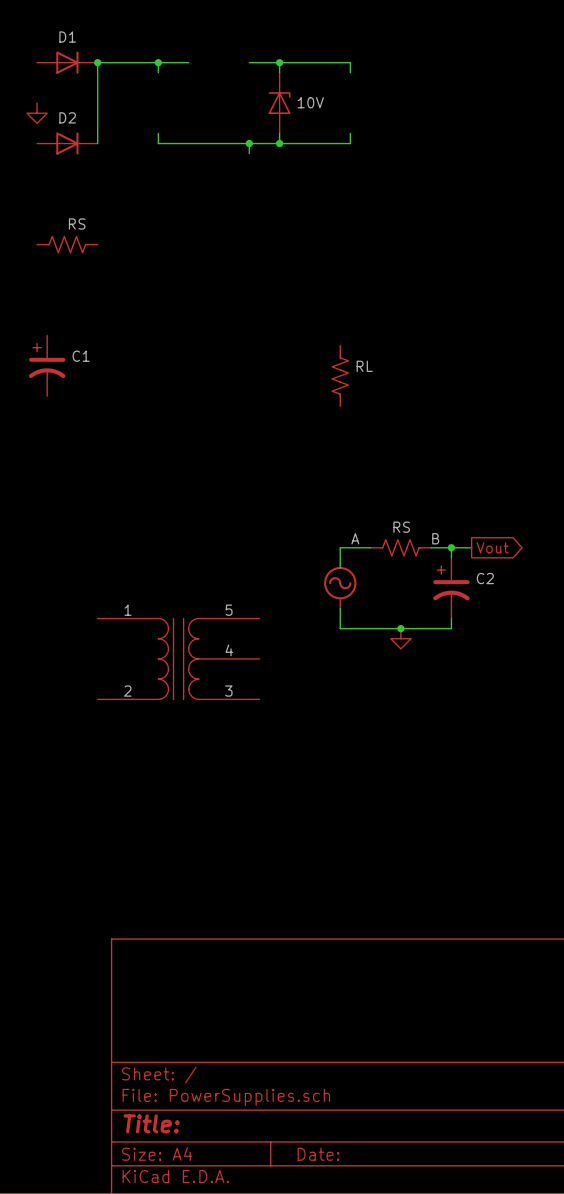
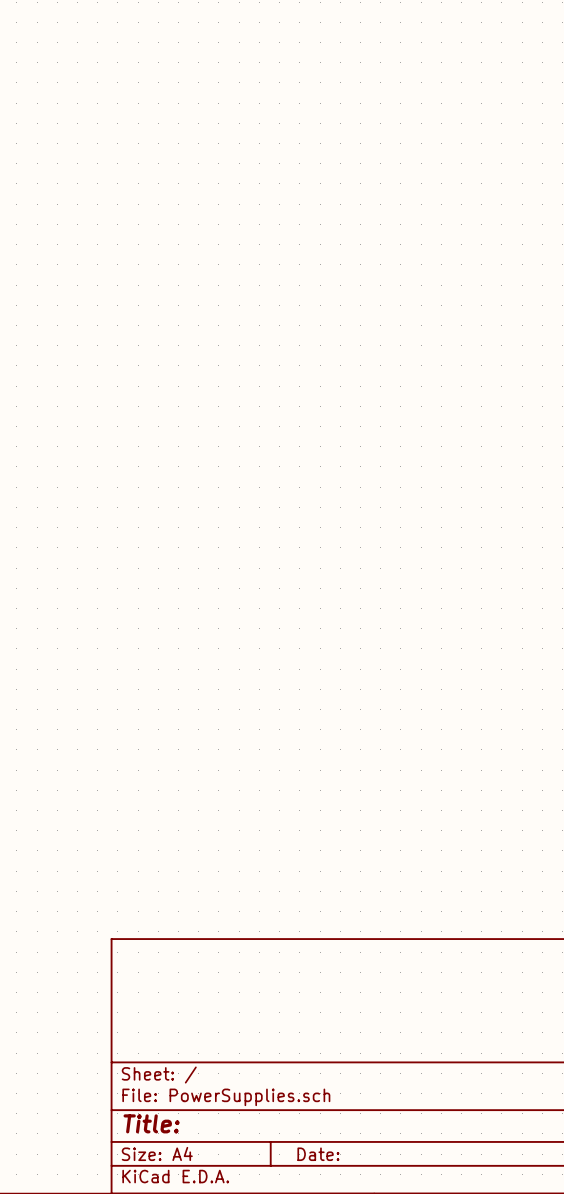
D1: (67, 62) -> none
junction: (97, 62) -> none
wire: (158, 62) (158, 72) -> none
junction: (158, 62) -> none
wire: (188, 62) (97, 62) (97, 143) -> none
wire: (249, 62) (350, 62) (350, 72) -> none
wire: (279, 62) (279, 72) -> none
junction: (279, 62) -> none
10V: (279, 103) -> none
power symbol: (37, 113) -> none
wire: (158, 133) (158, 143) (350, 143) (350, 133) -> none
wire: (279, 133) (279, 143) -> none
D2: (67, 143) -> none
wire: (249, 143) (249, 153) -> none
junction: (249, 143) -> none
junction: (279, 143) -> none
RS: (67, 244) -> none
C1: (47, 365) -> none
RL: (340, 375) -> none
label: A (355, 538) -> none
label: B (435, 538) -> none
wire: (370, 547) (340, 547) (340, 568) -> none
RS: (400, 547) -> none
wire: (431, 547) (471, 547) -> none
wire: (451, 547) (451, 557) -> none
junction: (451, 547) -> none
global label: Vout (492, 547) -> none
power symbol: (340, 587) -> none
C2: (451, 588) -> none
wire: (340, 608) (340, 628) (451, 628) (451, 618) -> none
junction: (400, 628) -> none
power symbol: (400, 638) -> none
part: (178, 658) -> none

